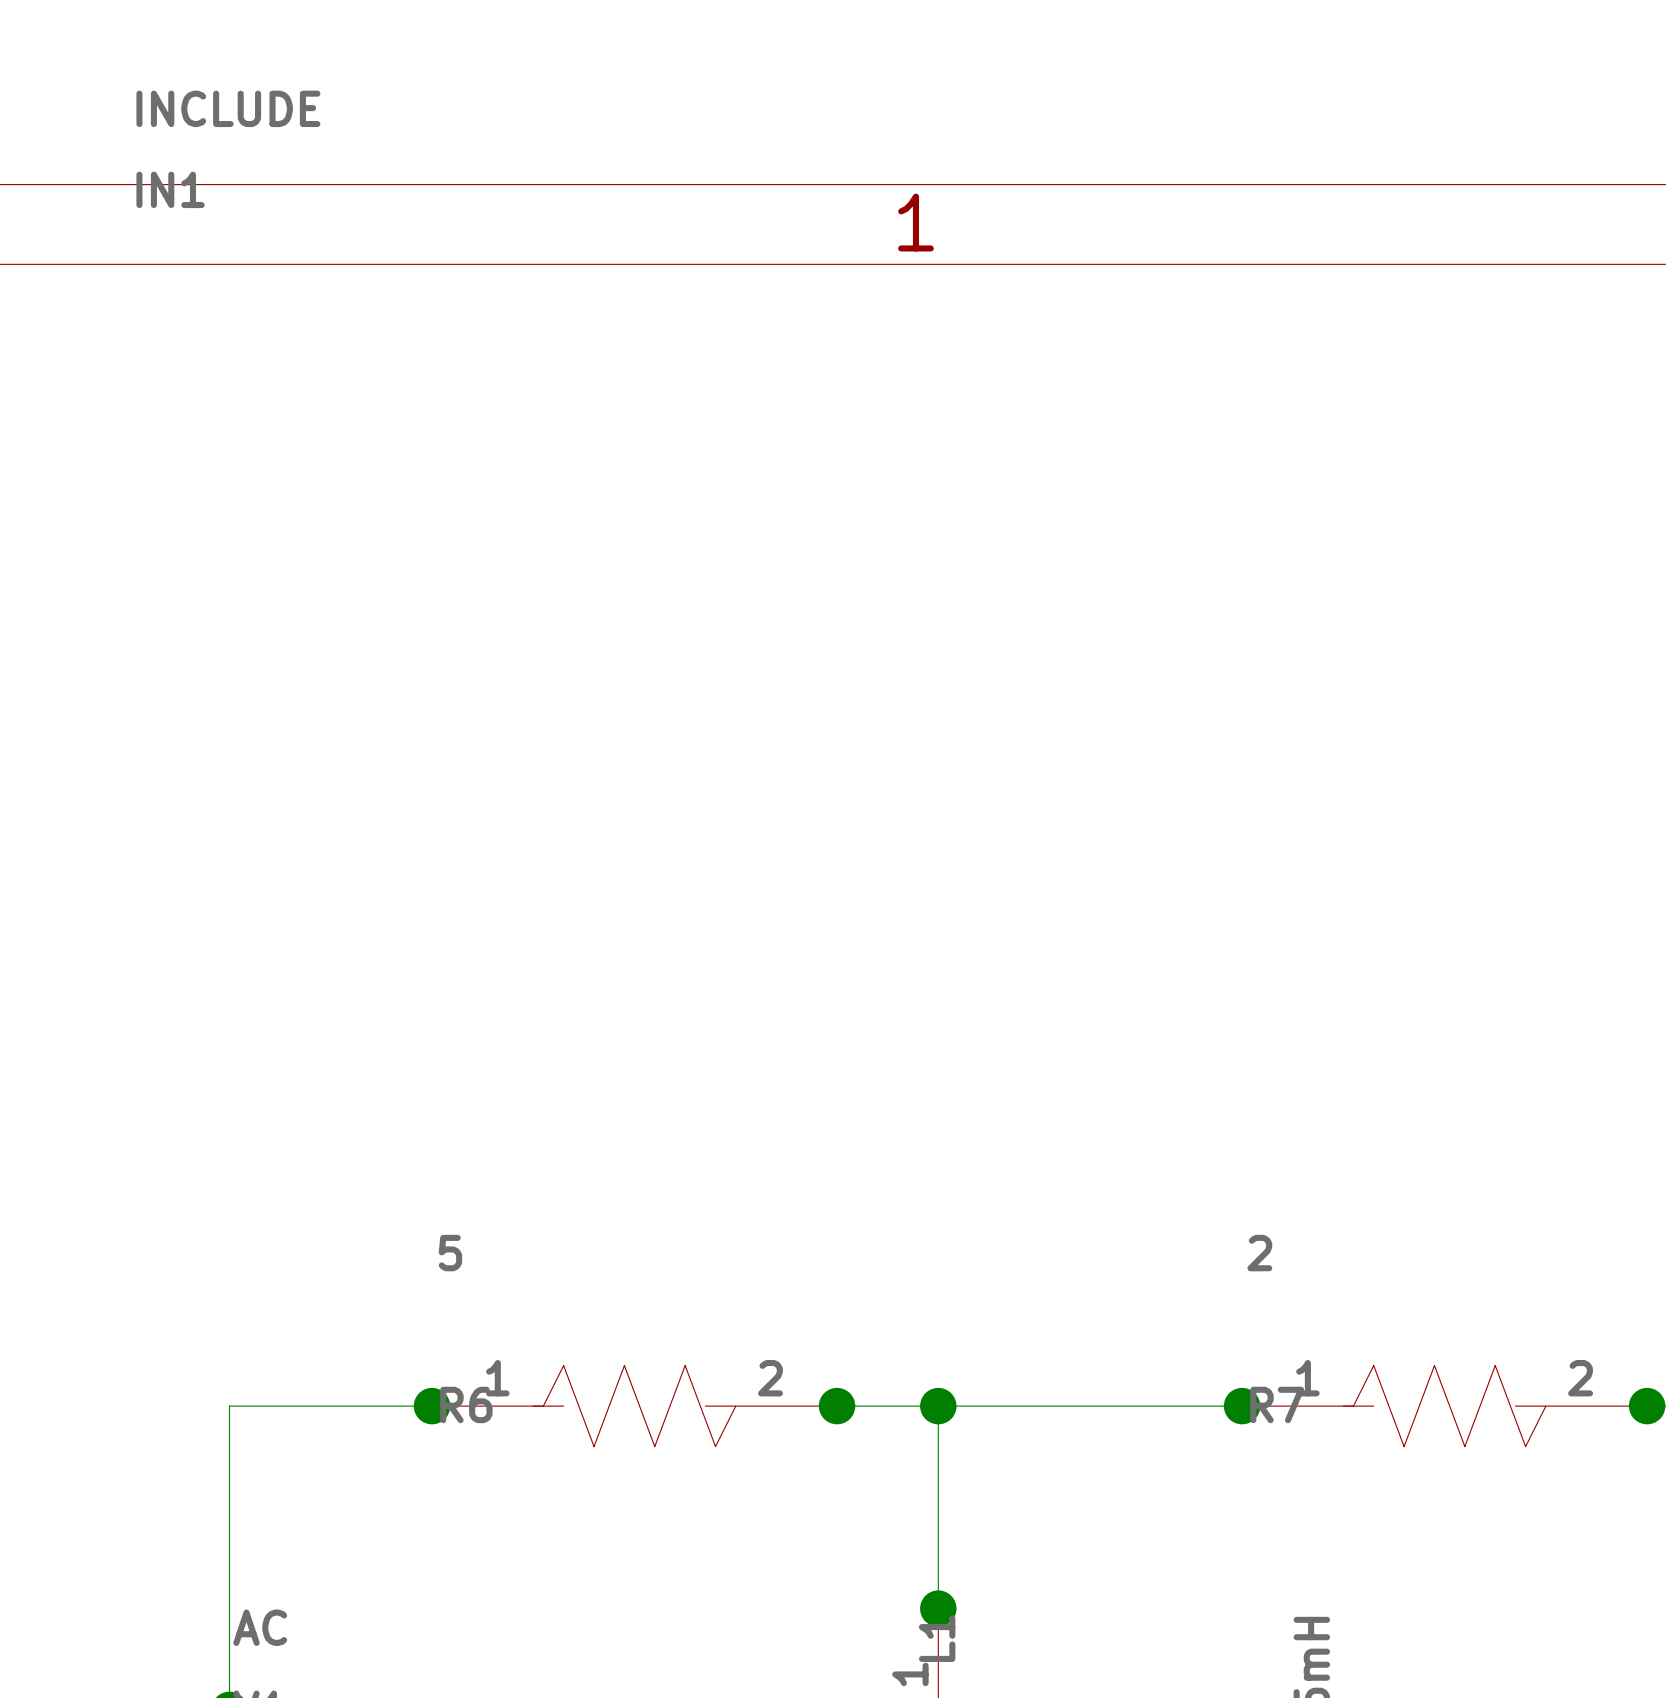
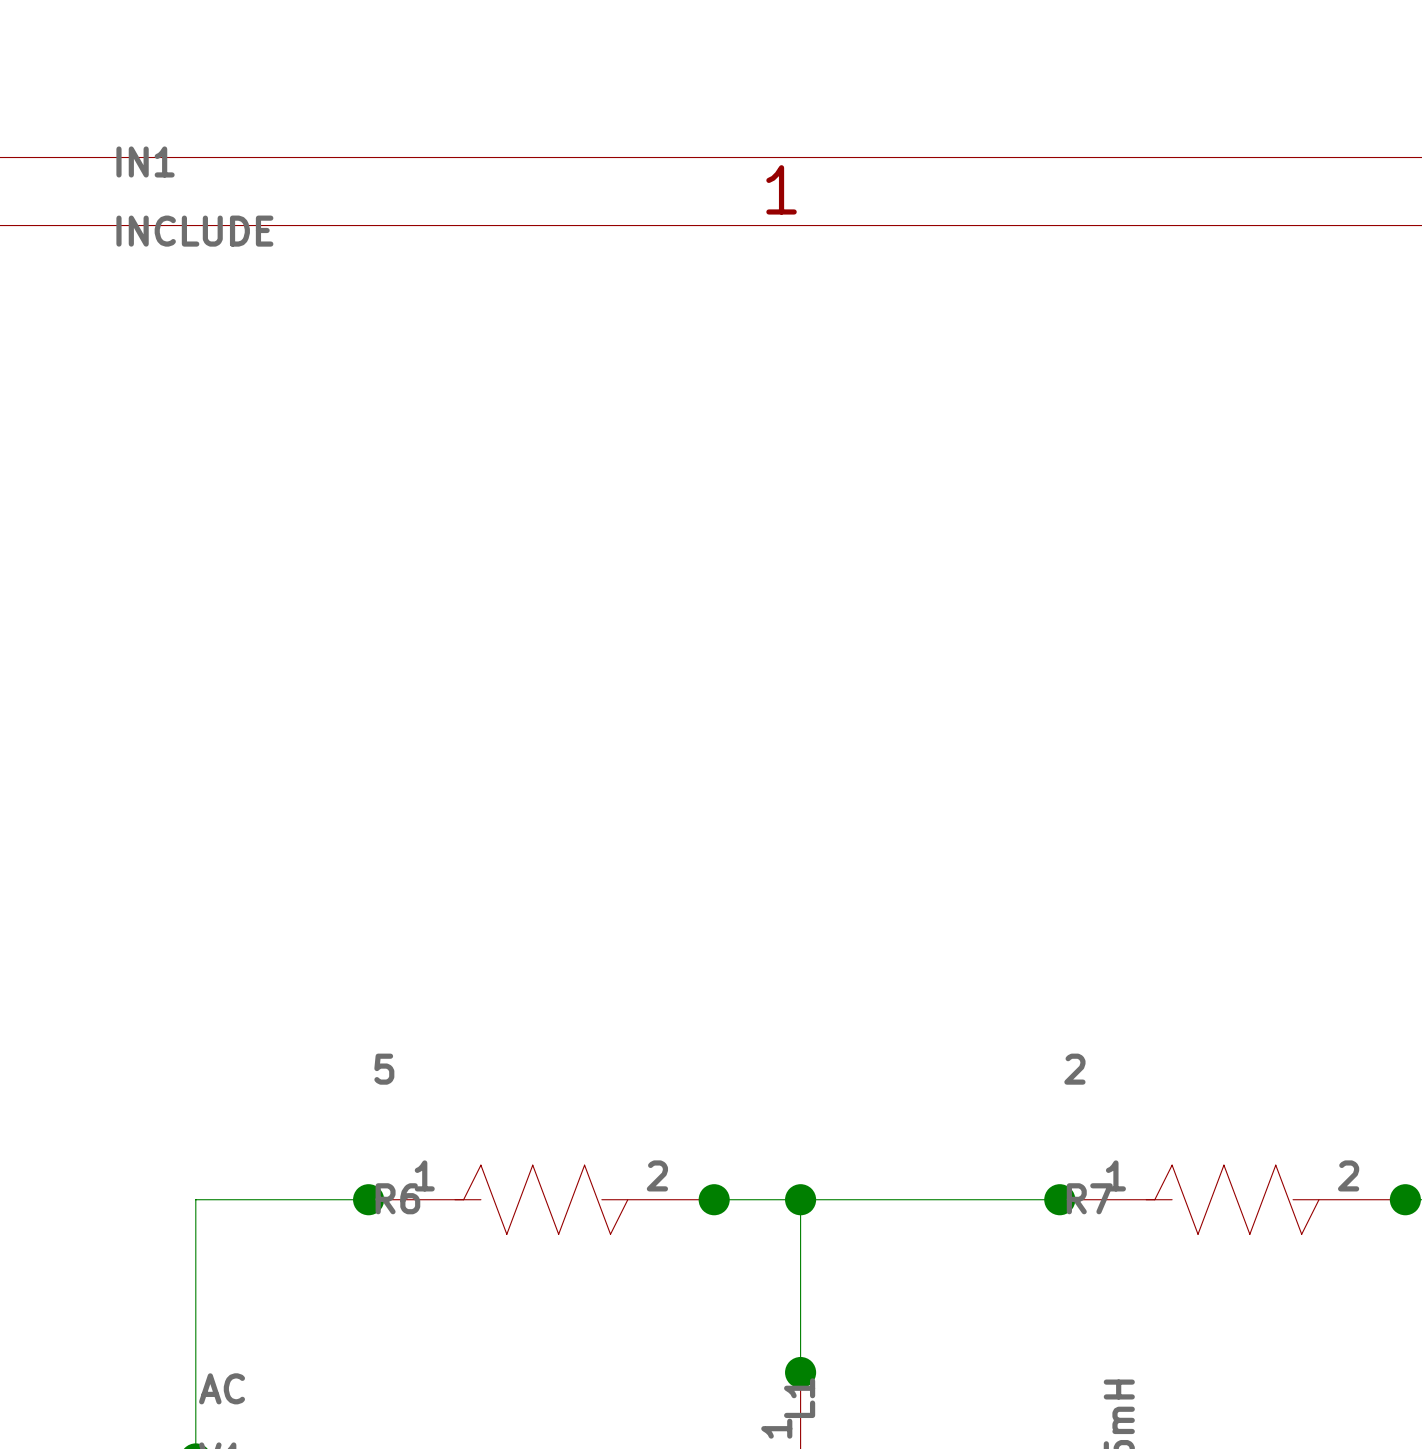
IN1 value position: INCLUDE (228, 108) -> INCLUDE (194, 231)
IN1 position: (228, 149) -> (194, 196)

